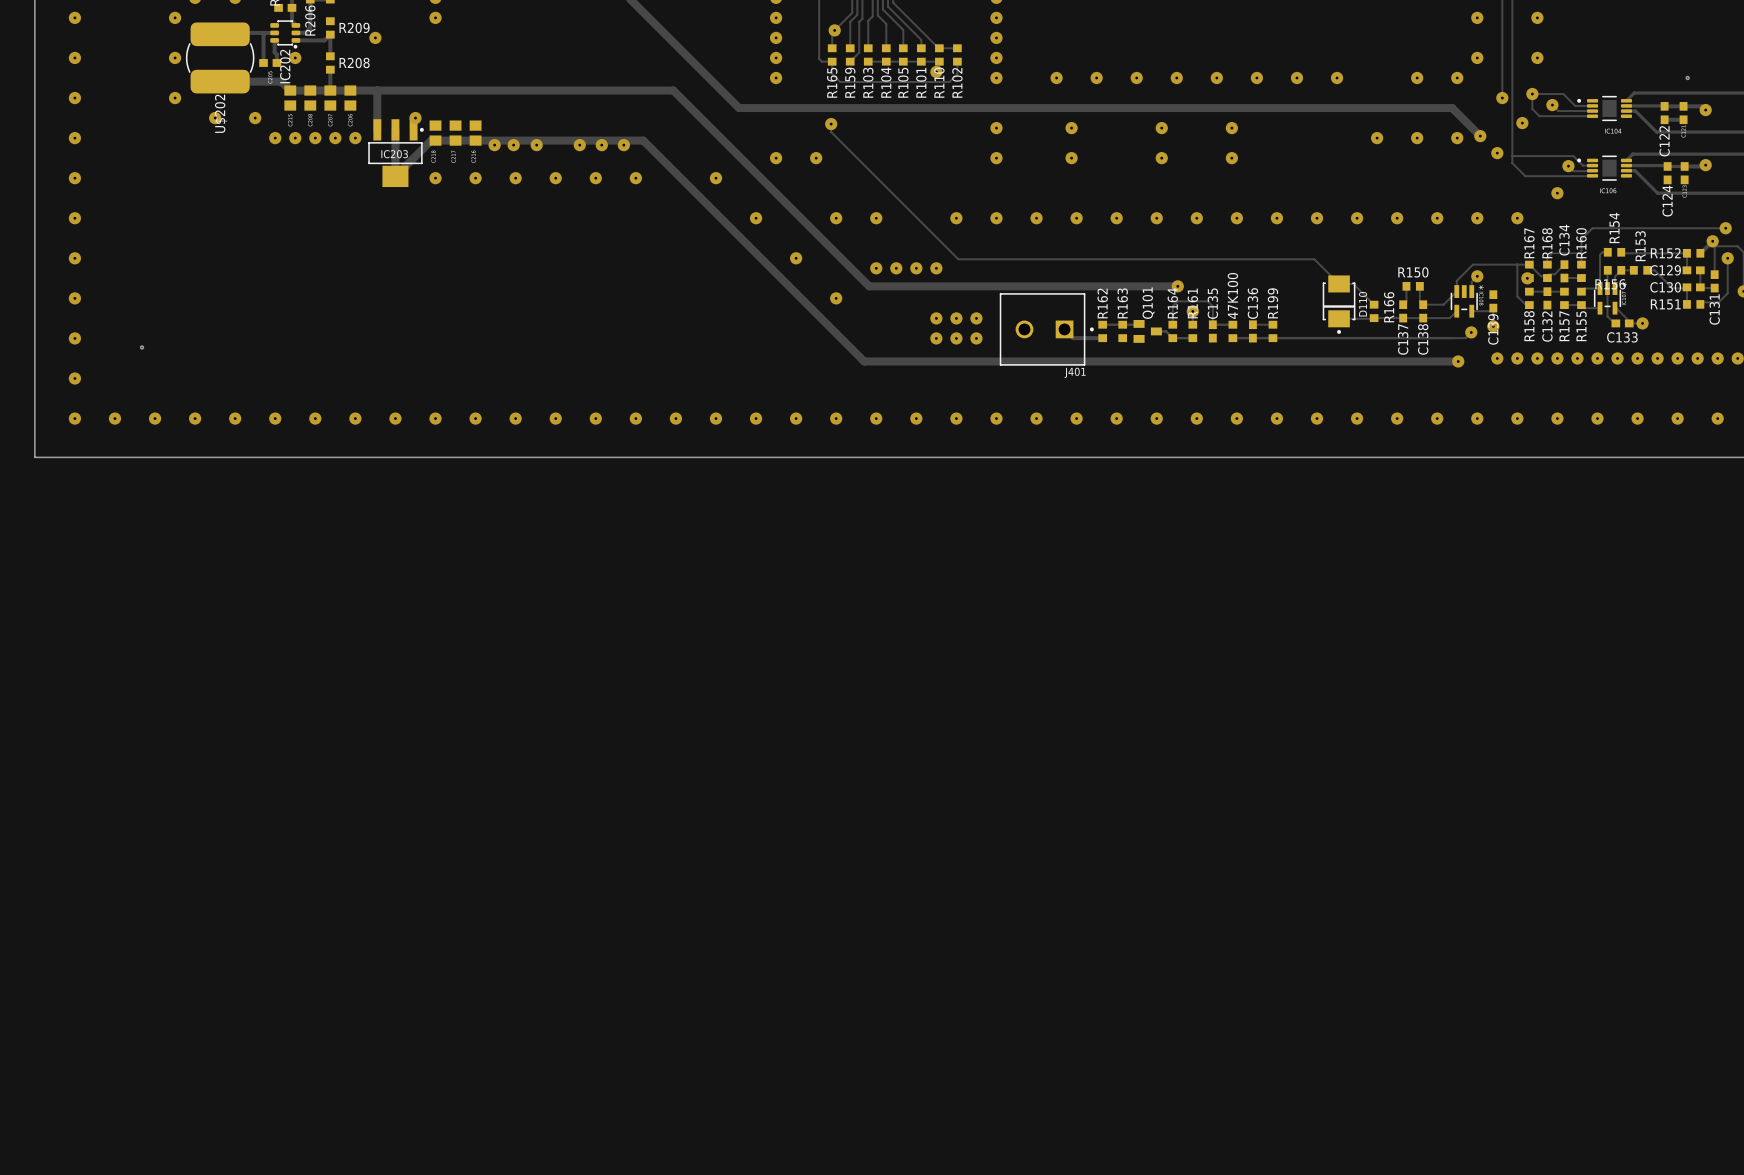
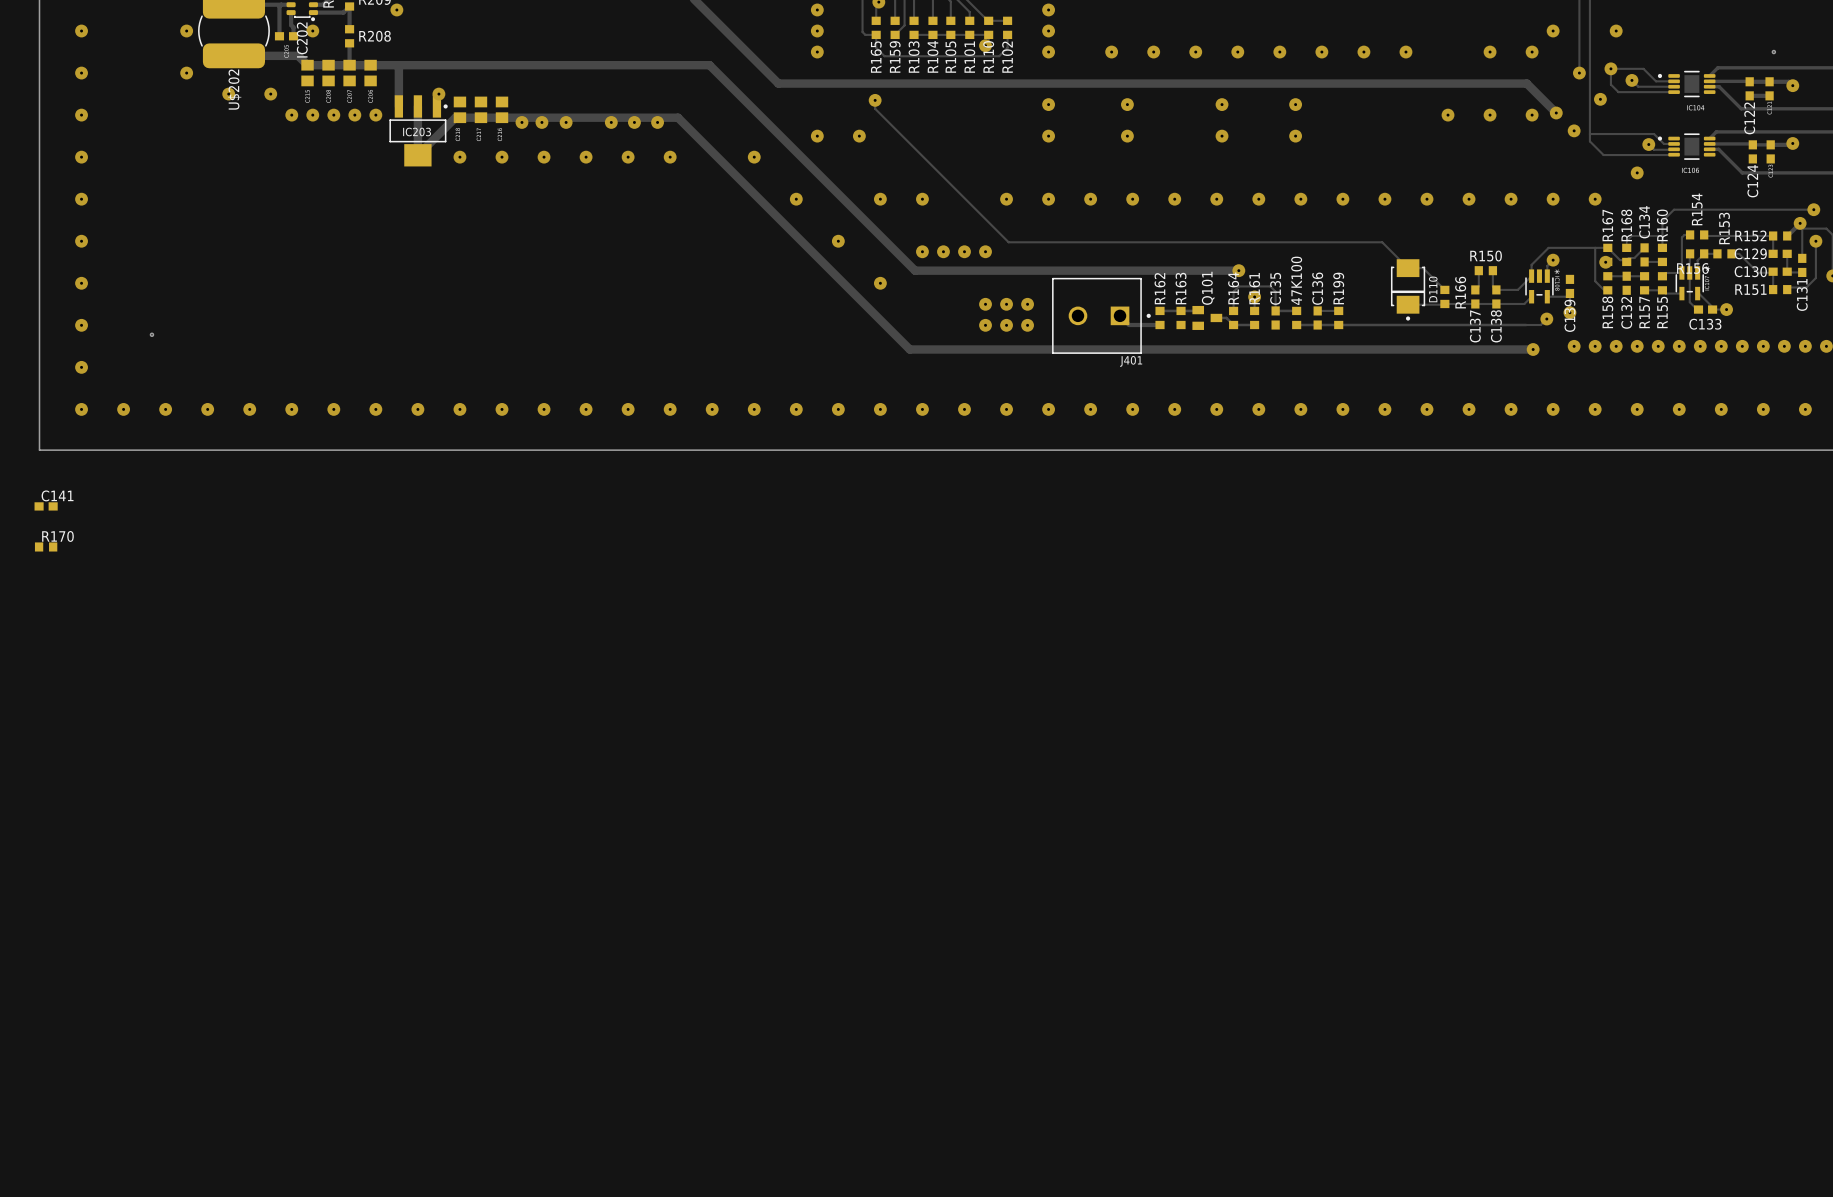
C141: none -> (46, 506)
R170: none -> (46, 546)

